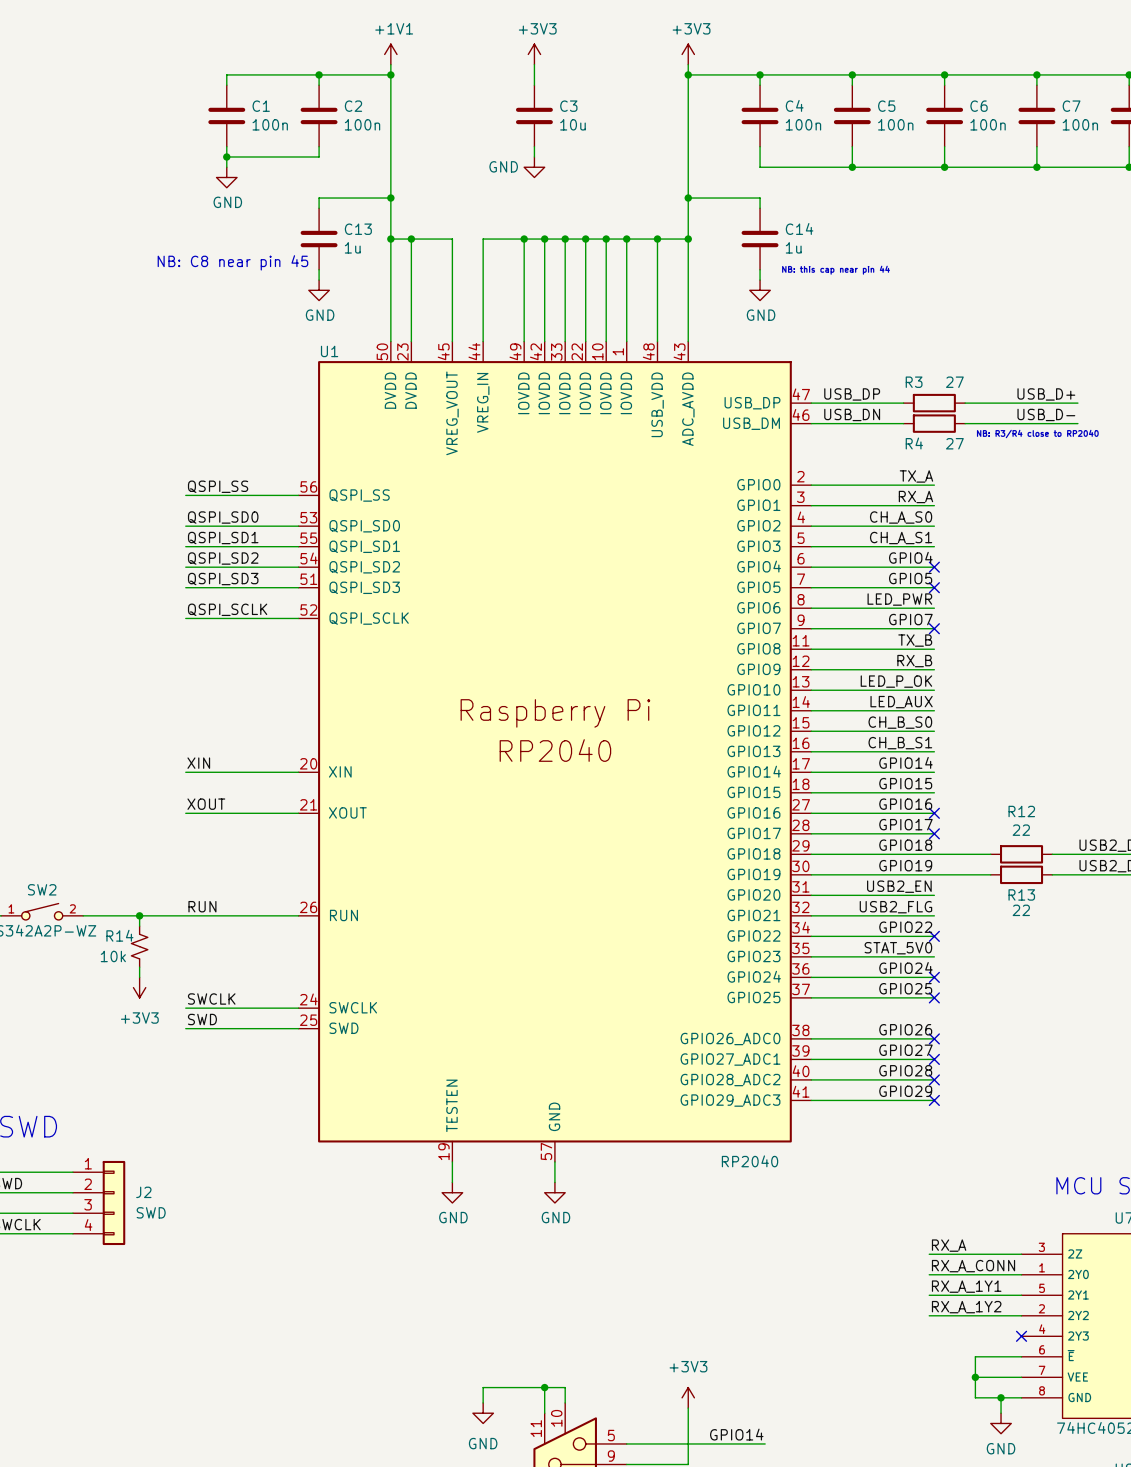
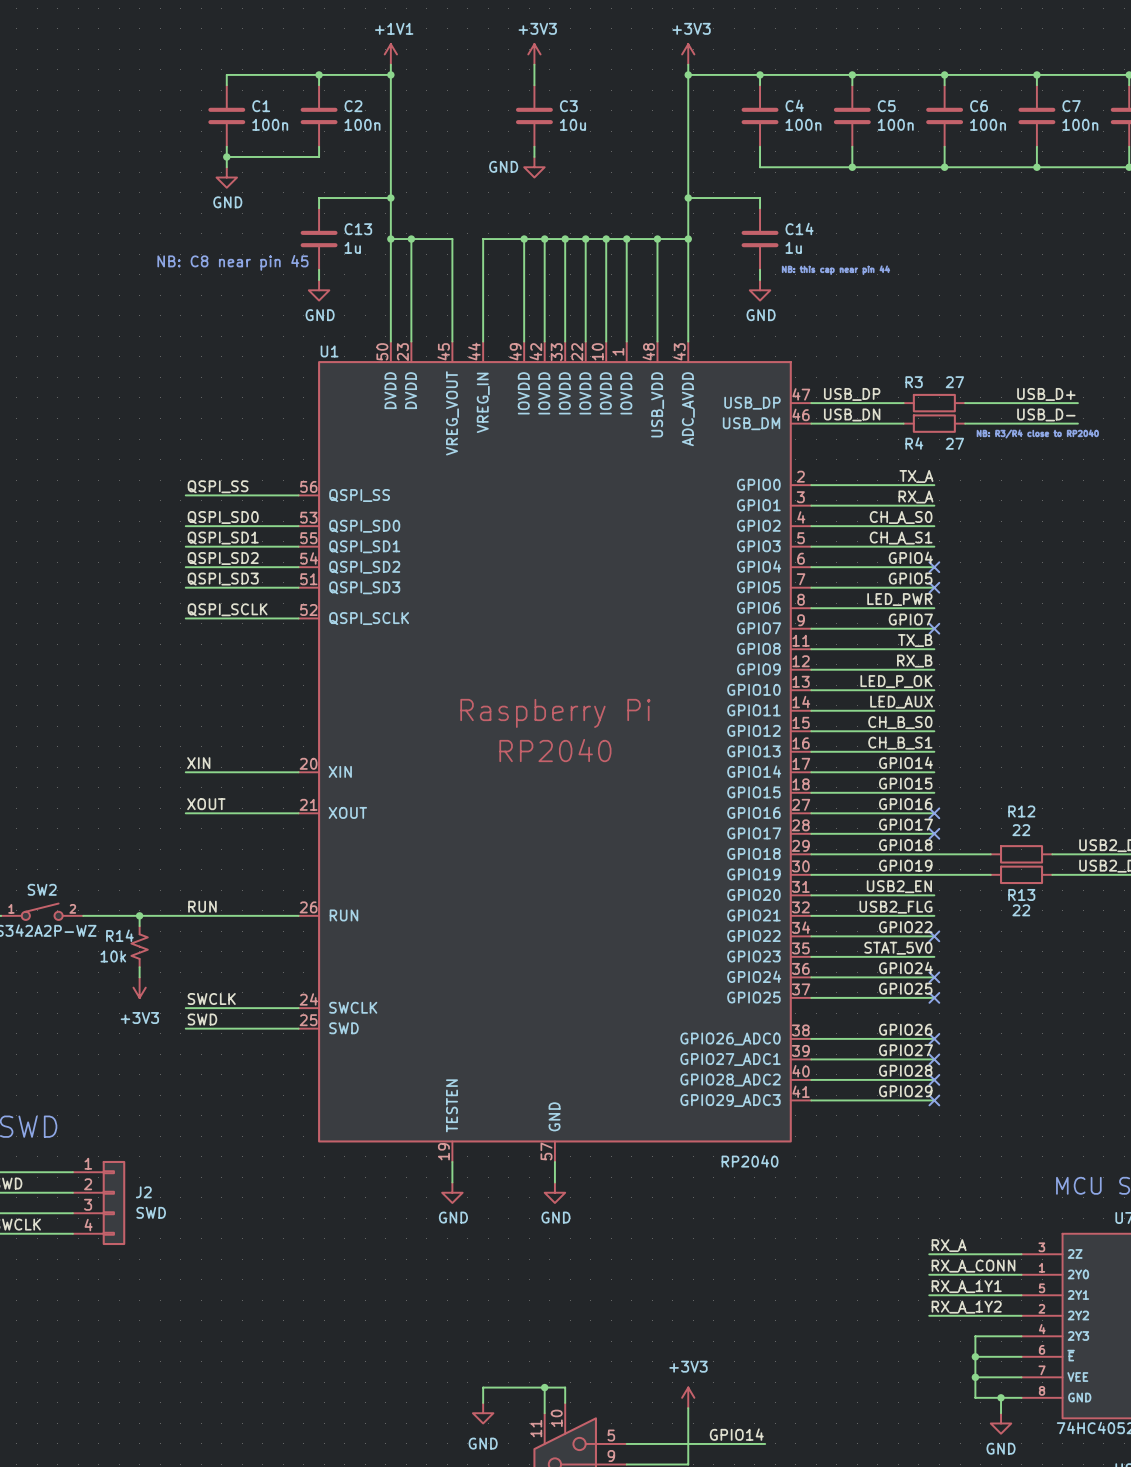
wire: none -> (1021, 1336) (975, 1336) (975, 1356)
no-connect mark: (1021, 1336) -> none
junction: none -> (975, 1356)

